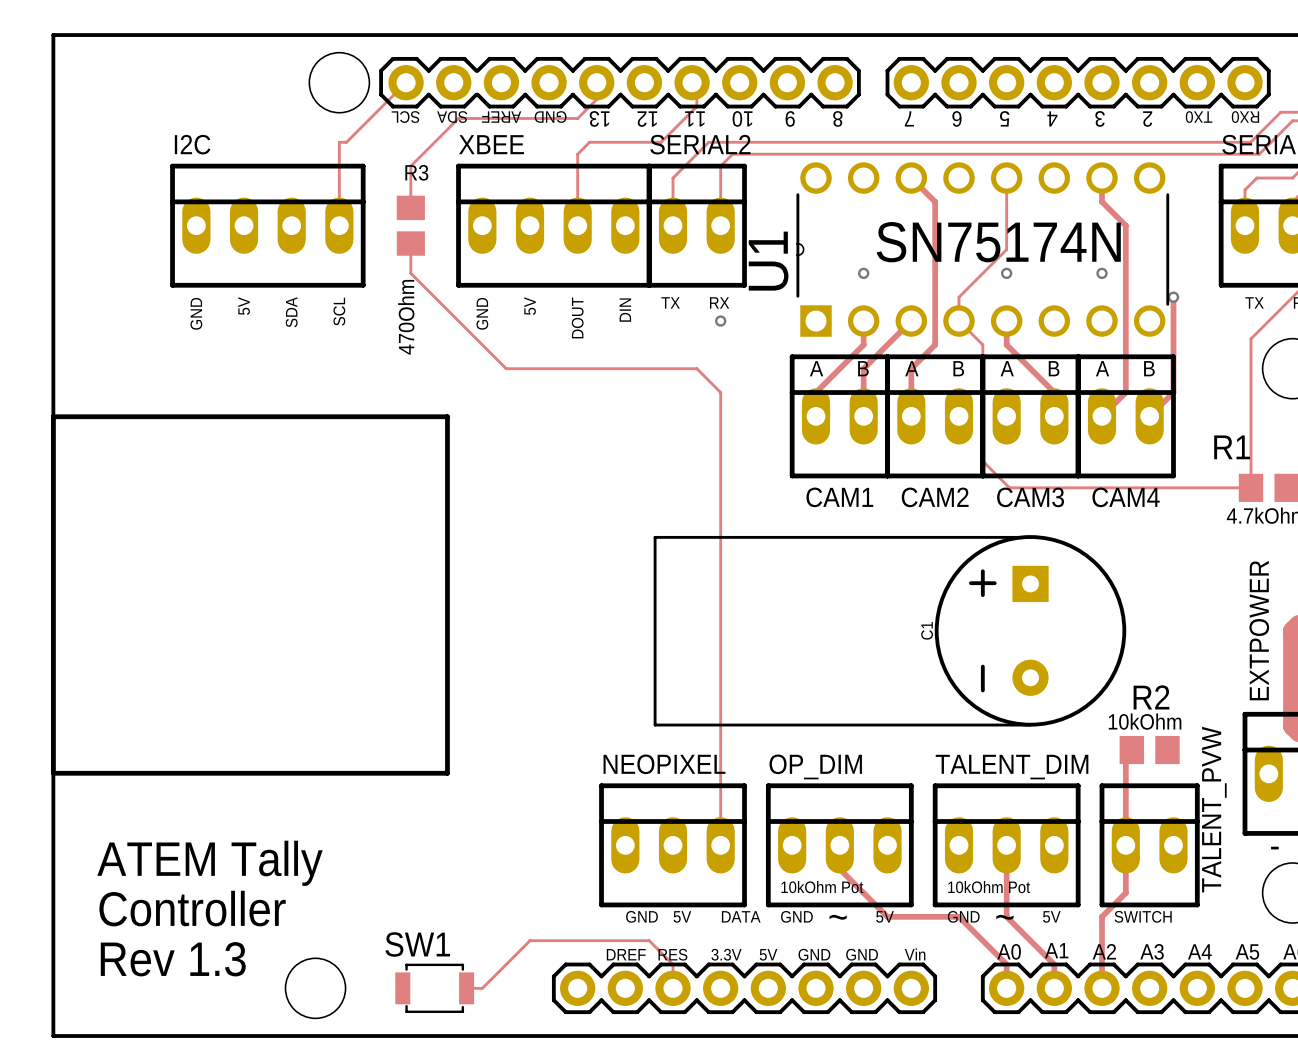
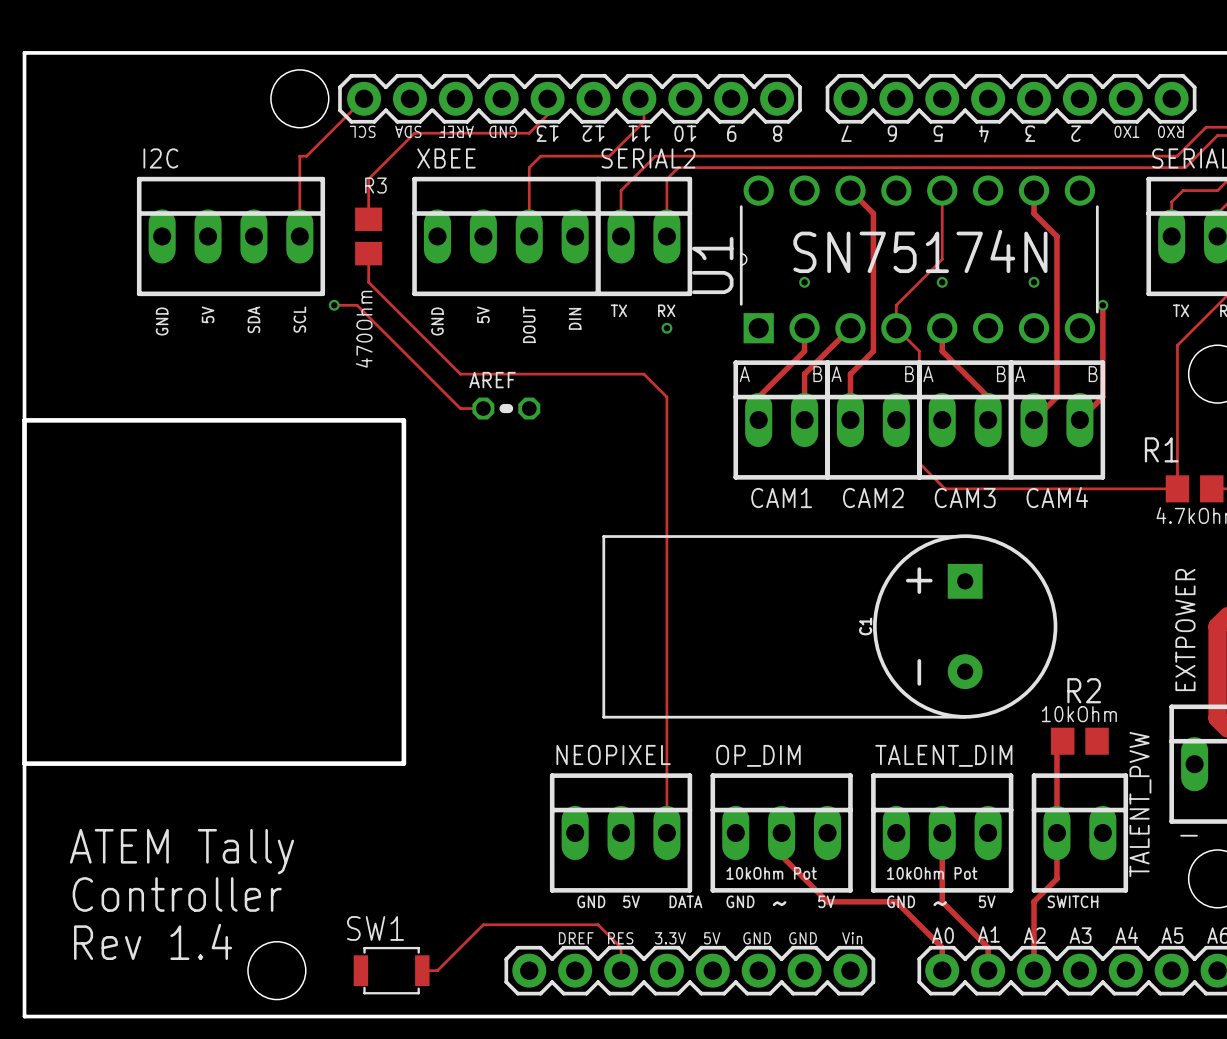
track: none -> (334, 305) (357, 305) (460, 408) (483, 408)
via: none -> (334, 305)
AREF: none -> (506, 408)
text: Rev 1.3 (173, 959) -> Rev 1.4 (153, 941)

